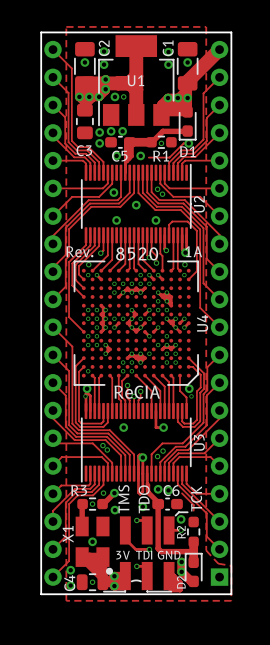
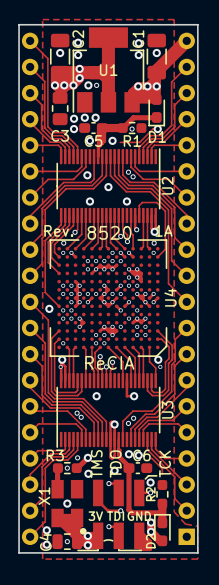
via: none -> (49, 308)

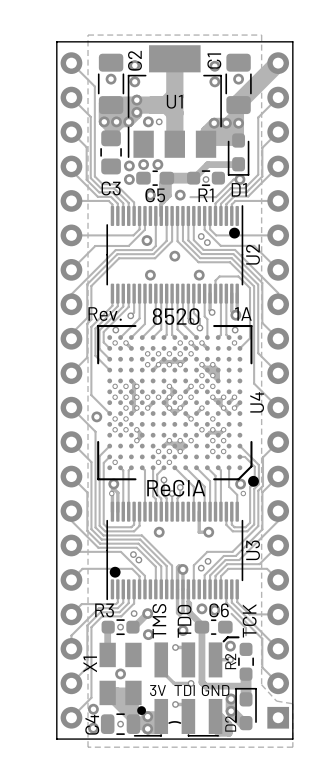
U2 footprint: [56, 148, 161, 224] -> [106, 205, 244, 304]
U4 footprint: [49, 239, 168, 357] -> [97, 324, 259, 487]
U3 footprint: [56, 373, 161, 448] -> [106, 501, 244, 601]

